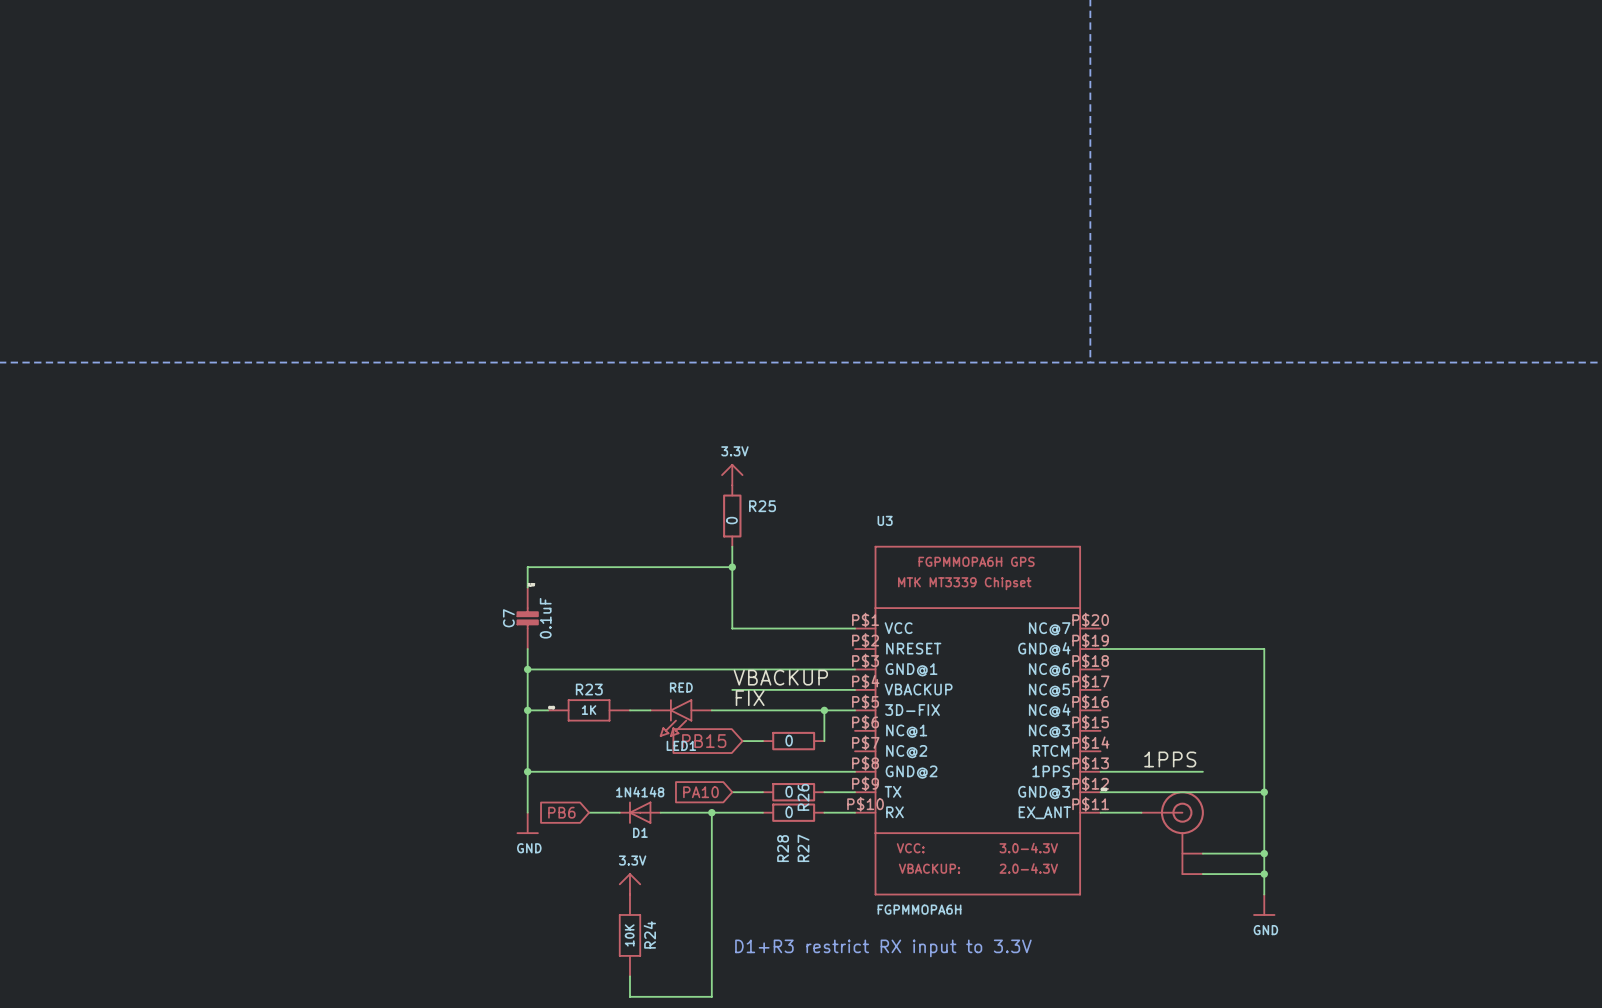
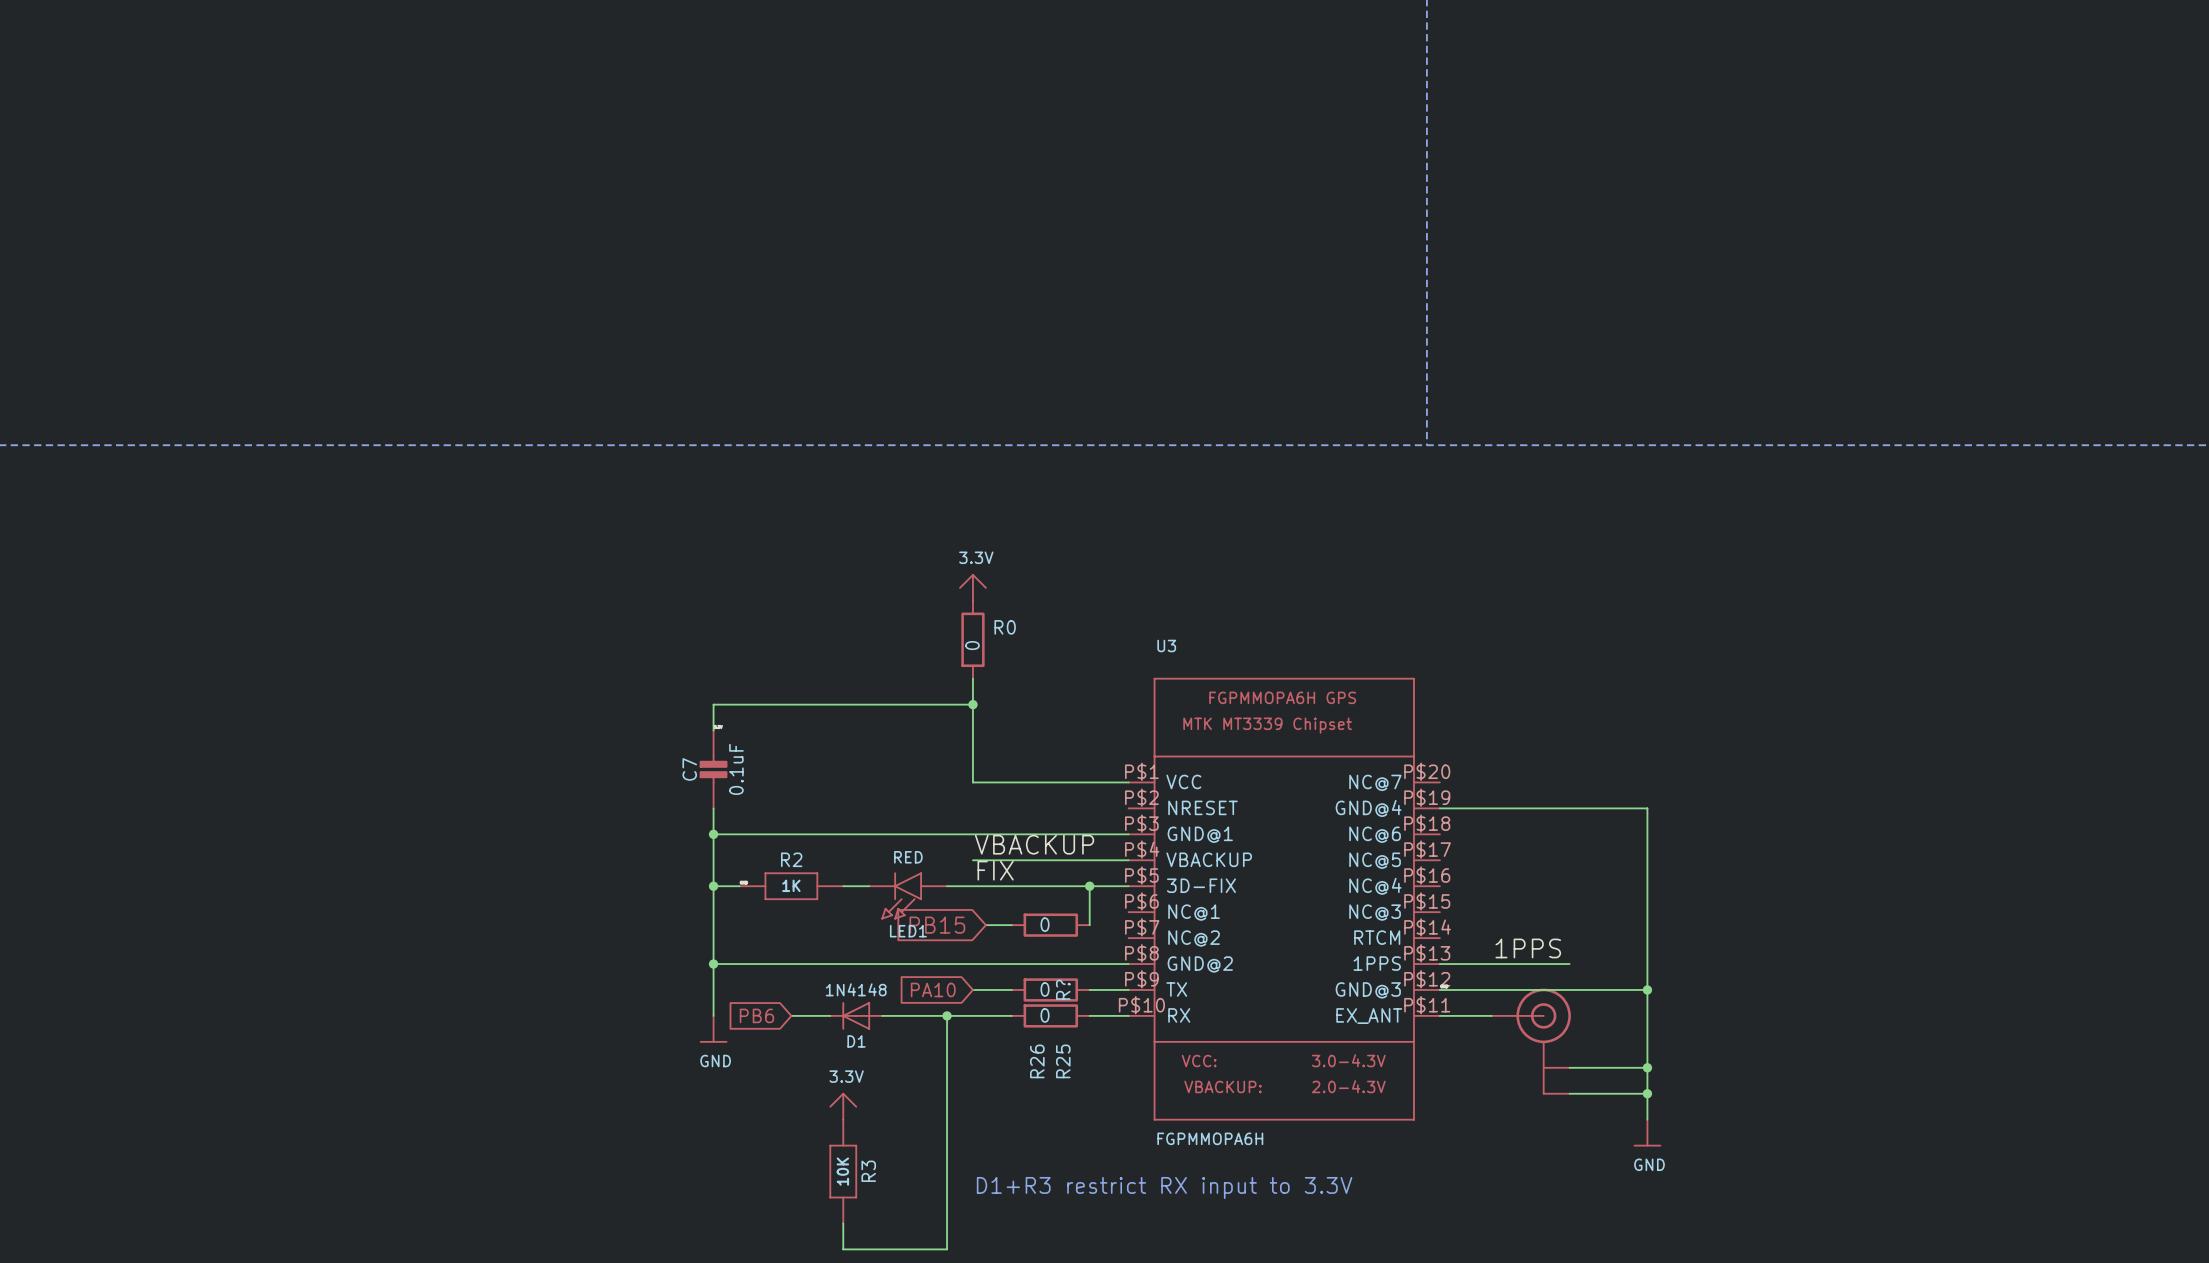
R25 name: R25 (762, 506) -> R0 (1005, 627)
R23 name: R23 (589, 689) -> R2 (791, 859)
R26 name: R26 (803, 797) -> R? (1063, 989)
R28 name: R28 (783, 848) -> R26 (1037, 1061)
R27 name: R27 (803, 848) -> R25 (1063, 1061)
R24 name: R24 (649, 934) -> R3 (868, 1171)

